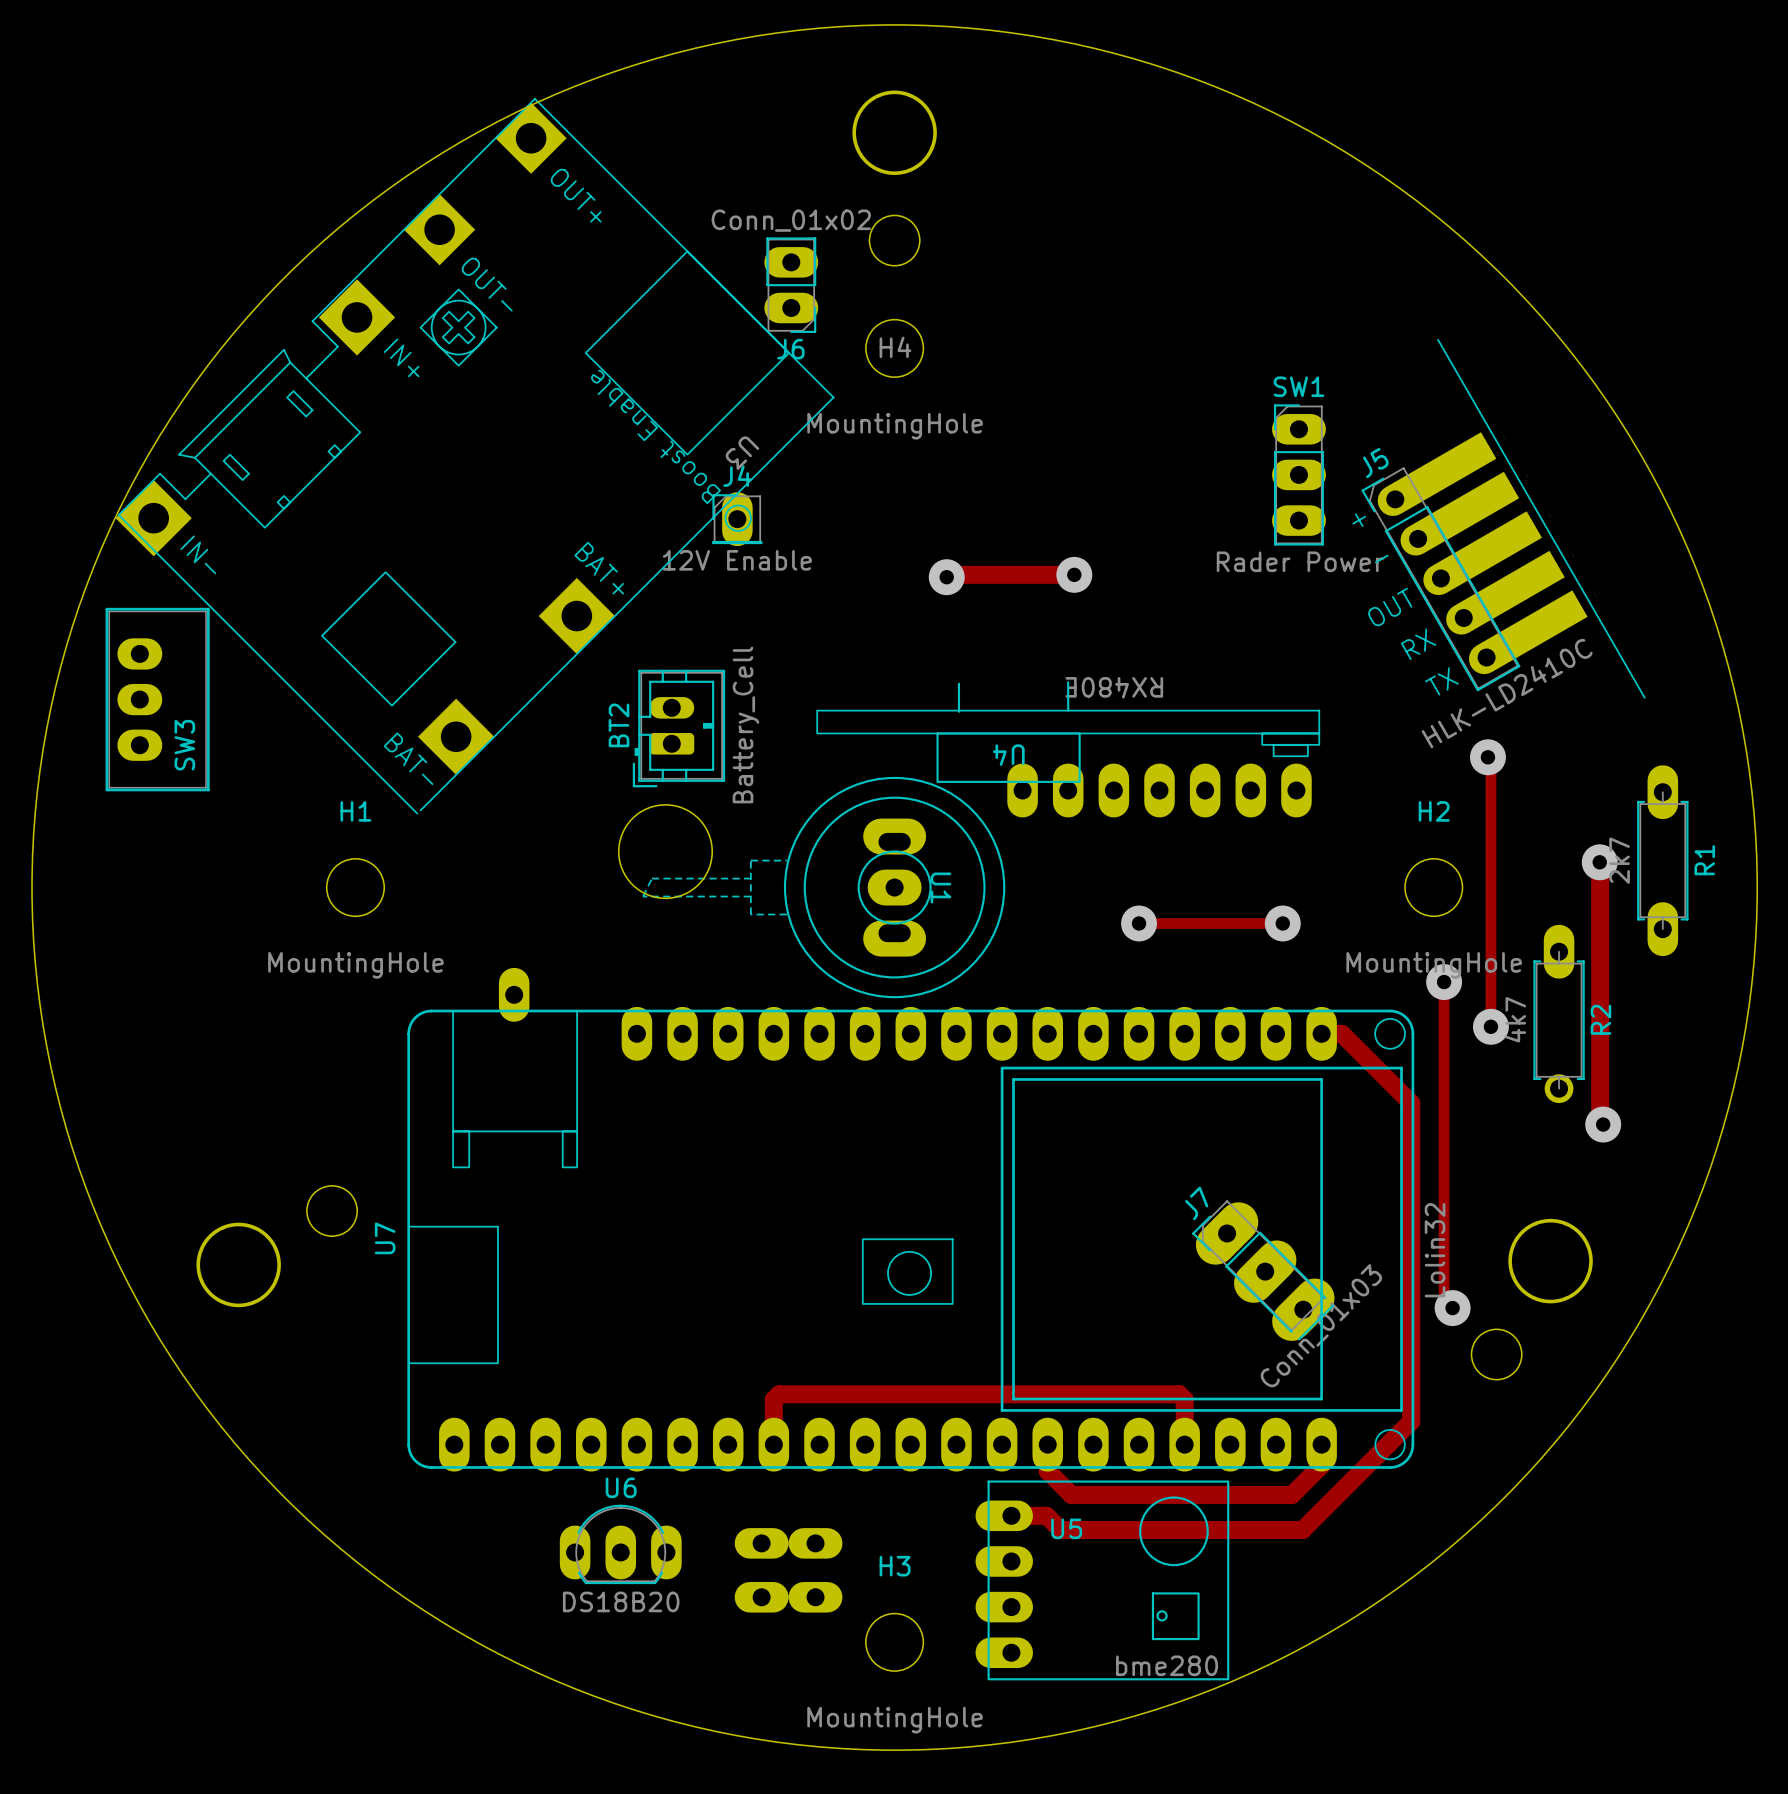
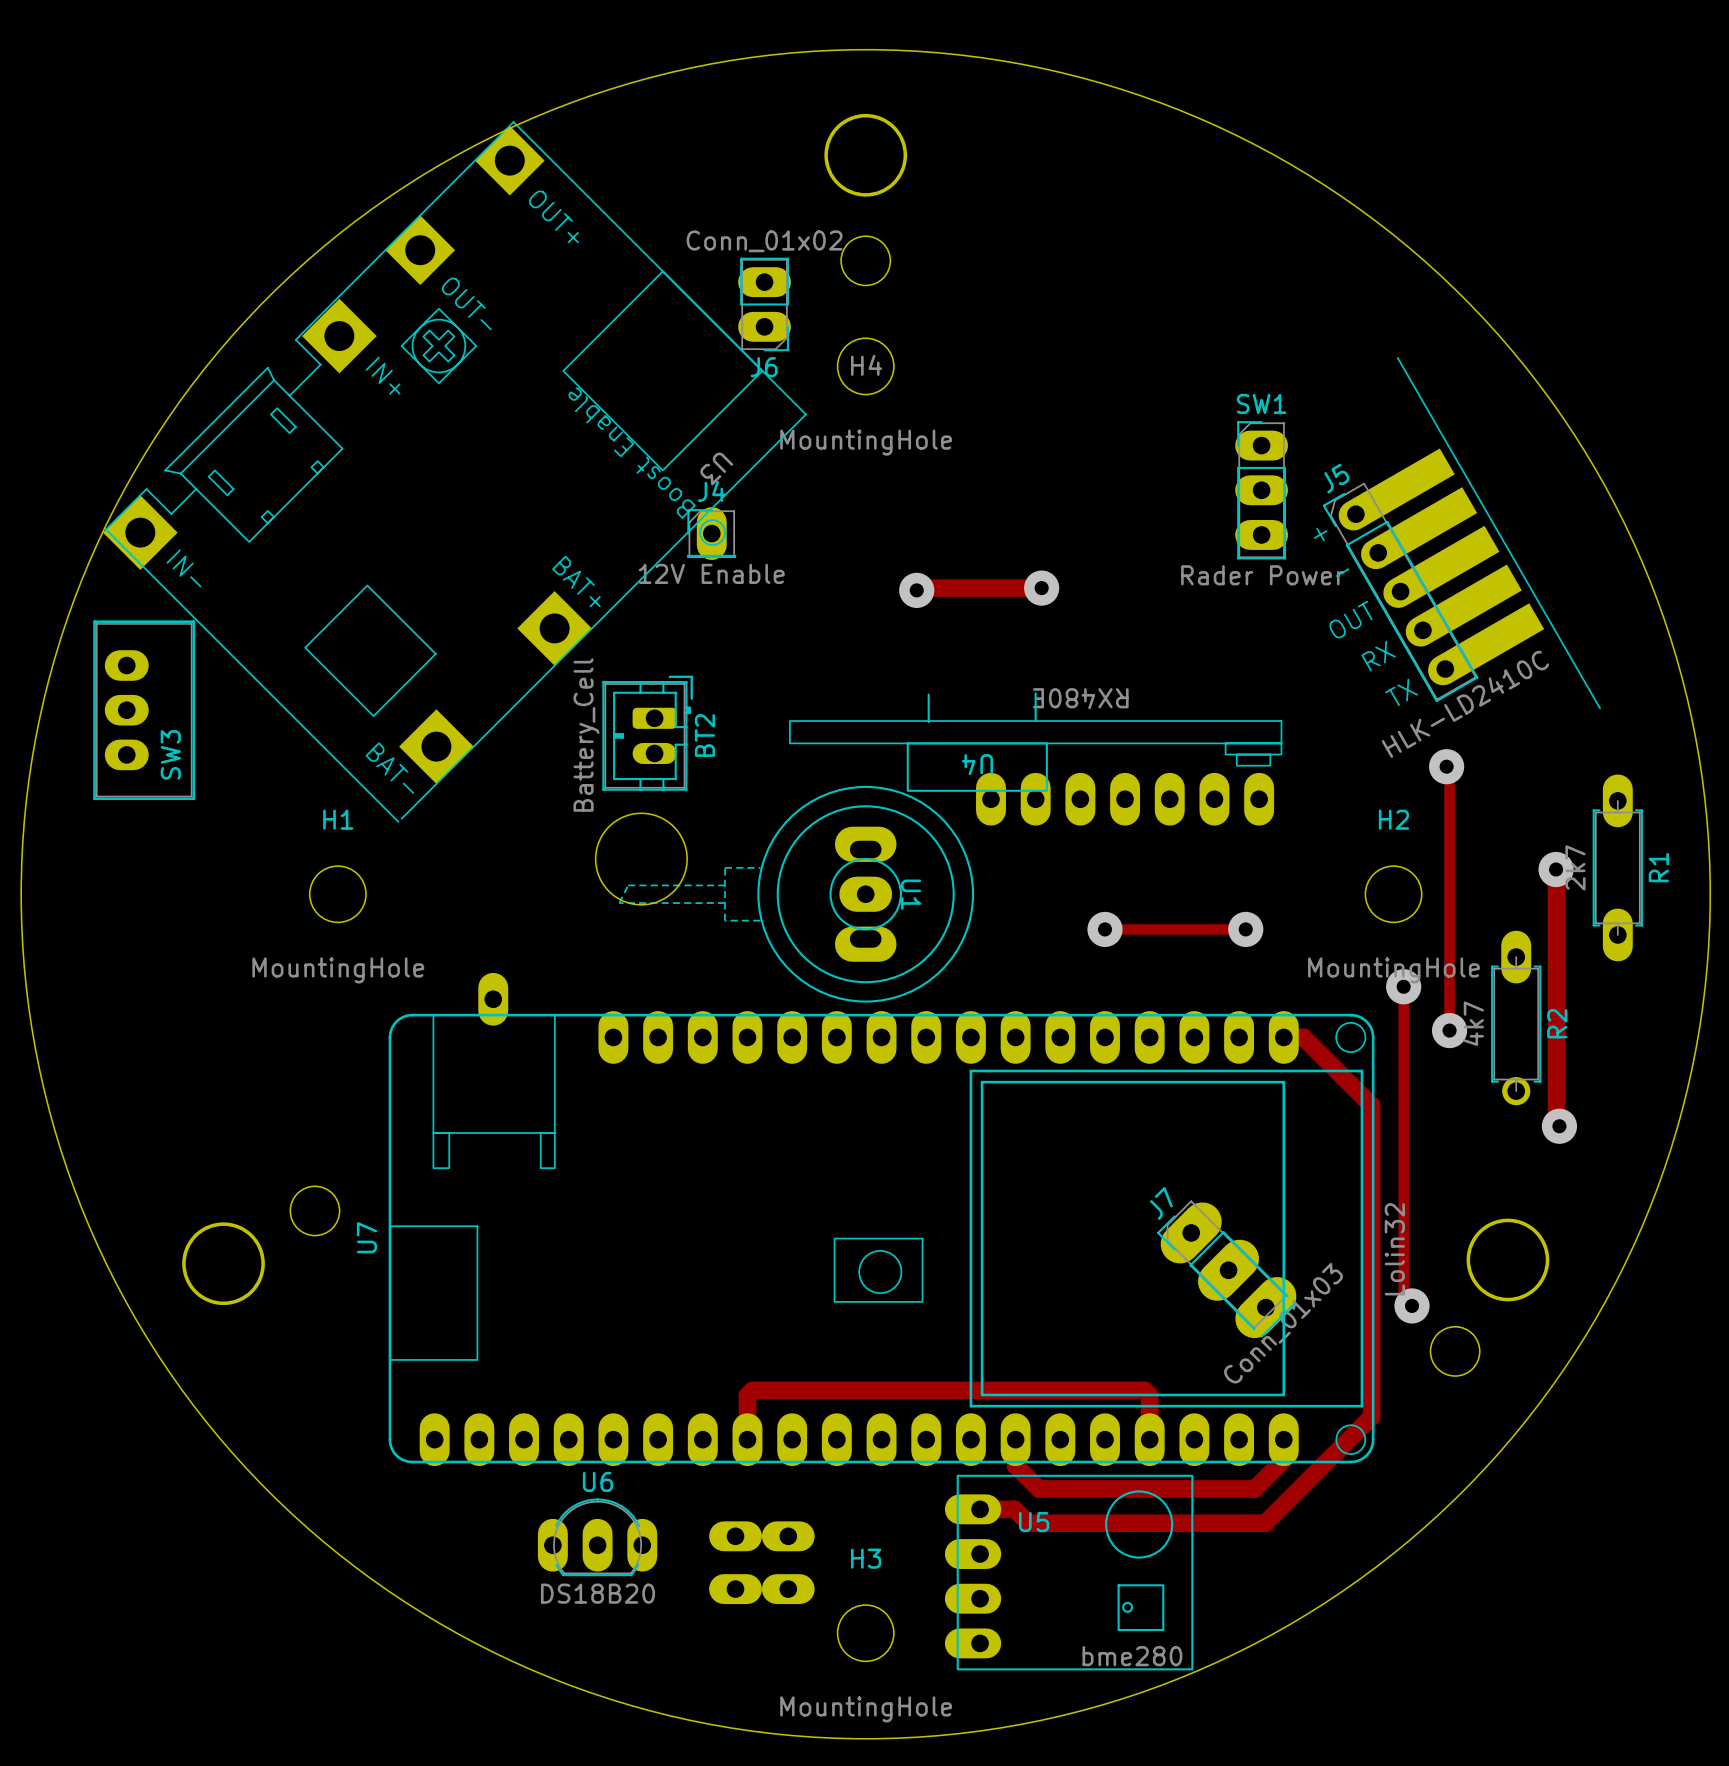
BT2 rotation: 0° (678, 728) -> 180° (647, 733)

